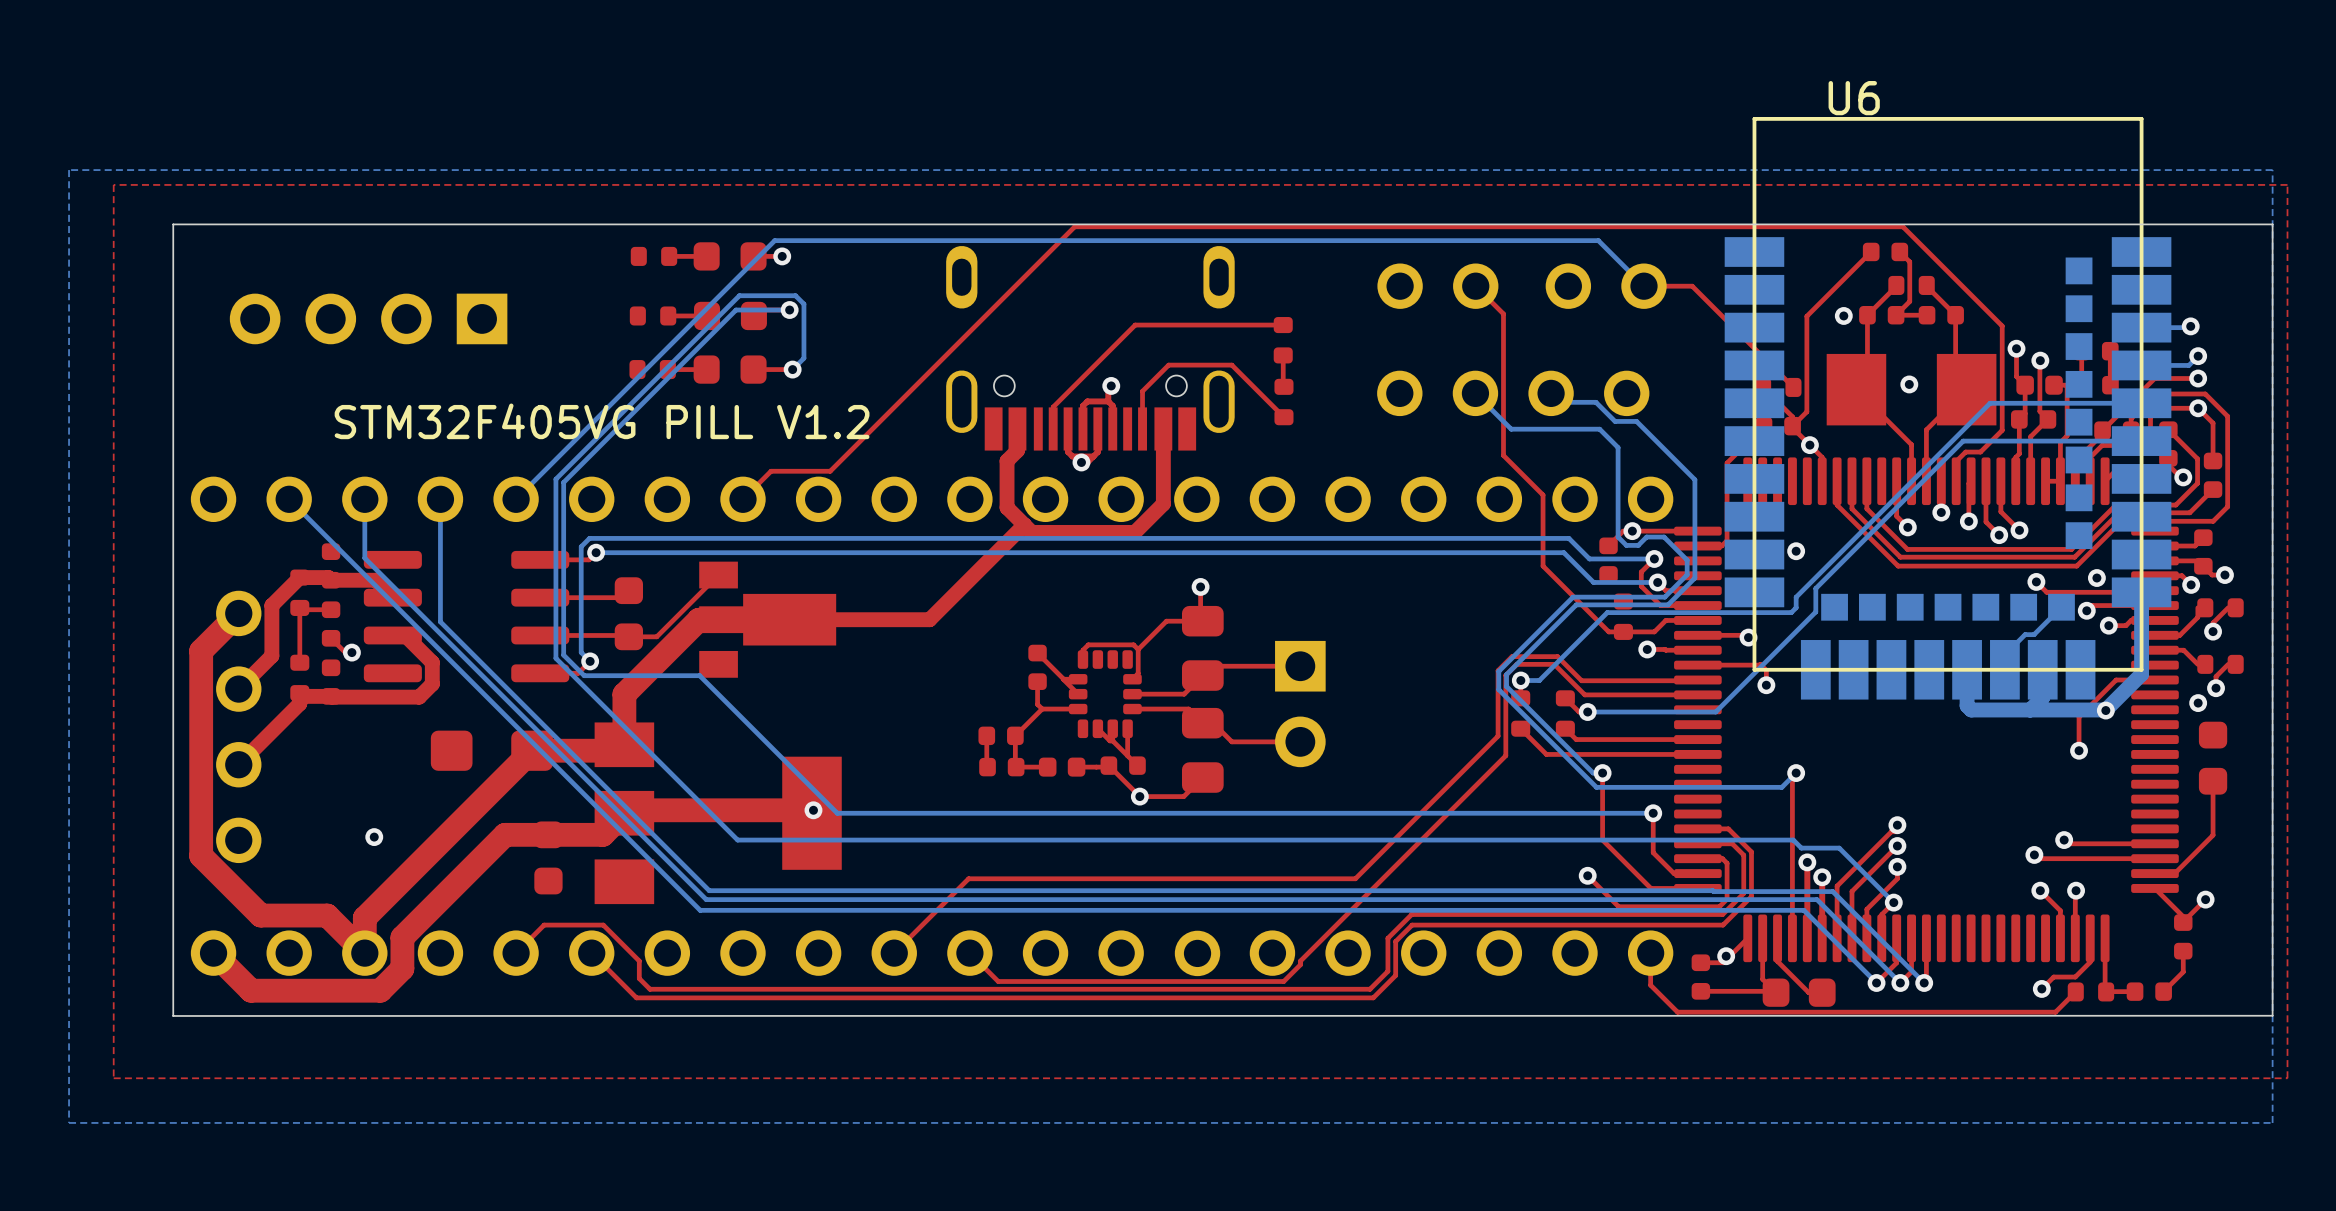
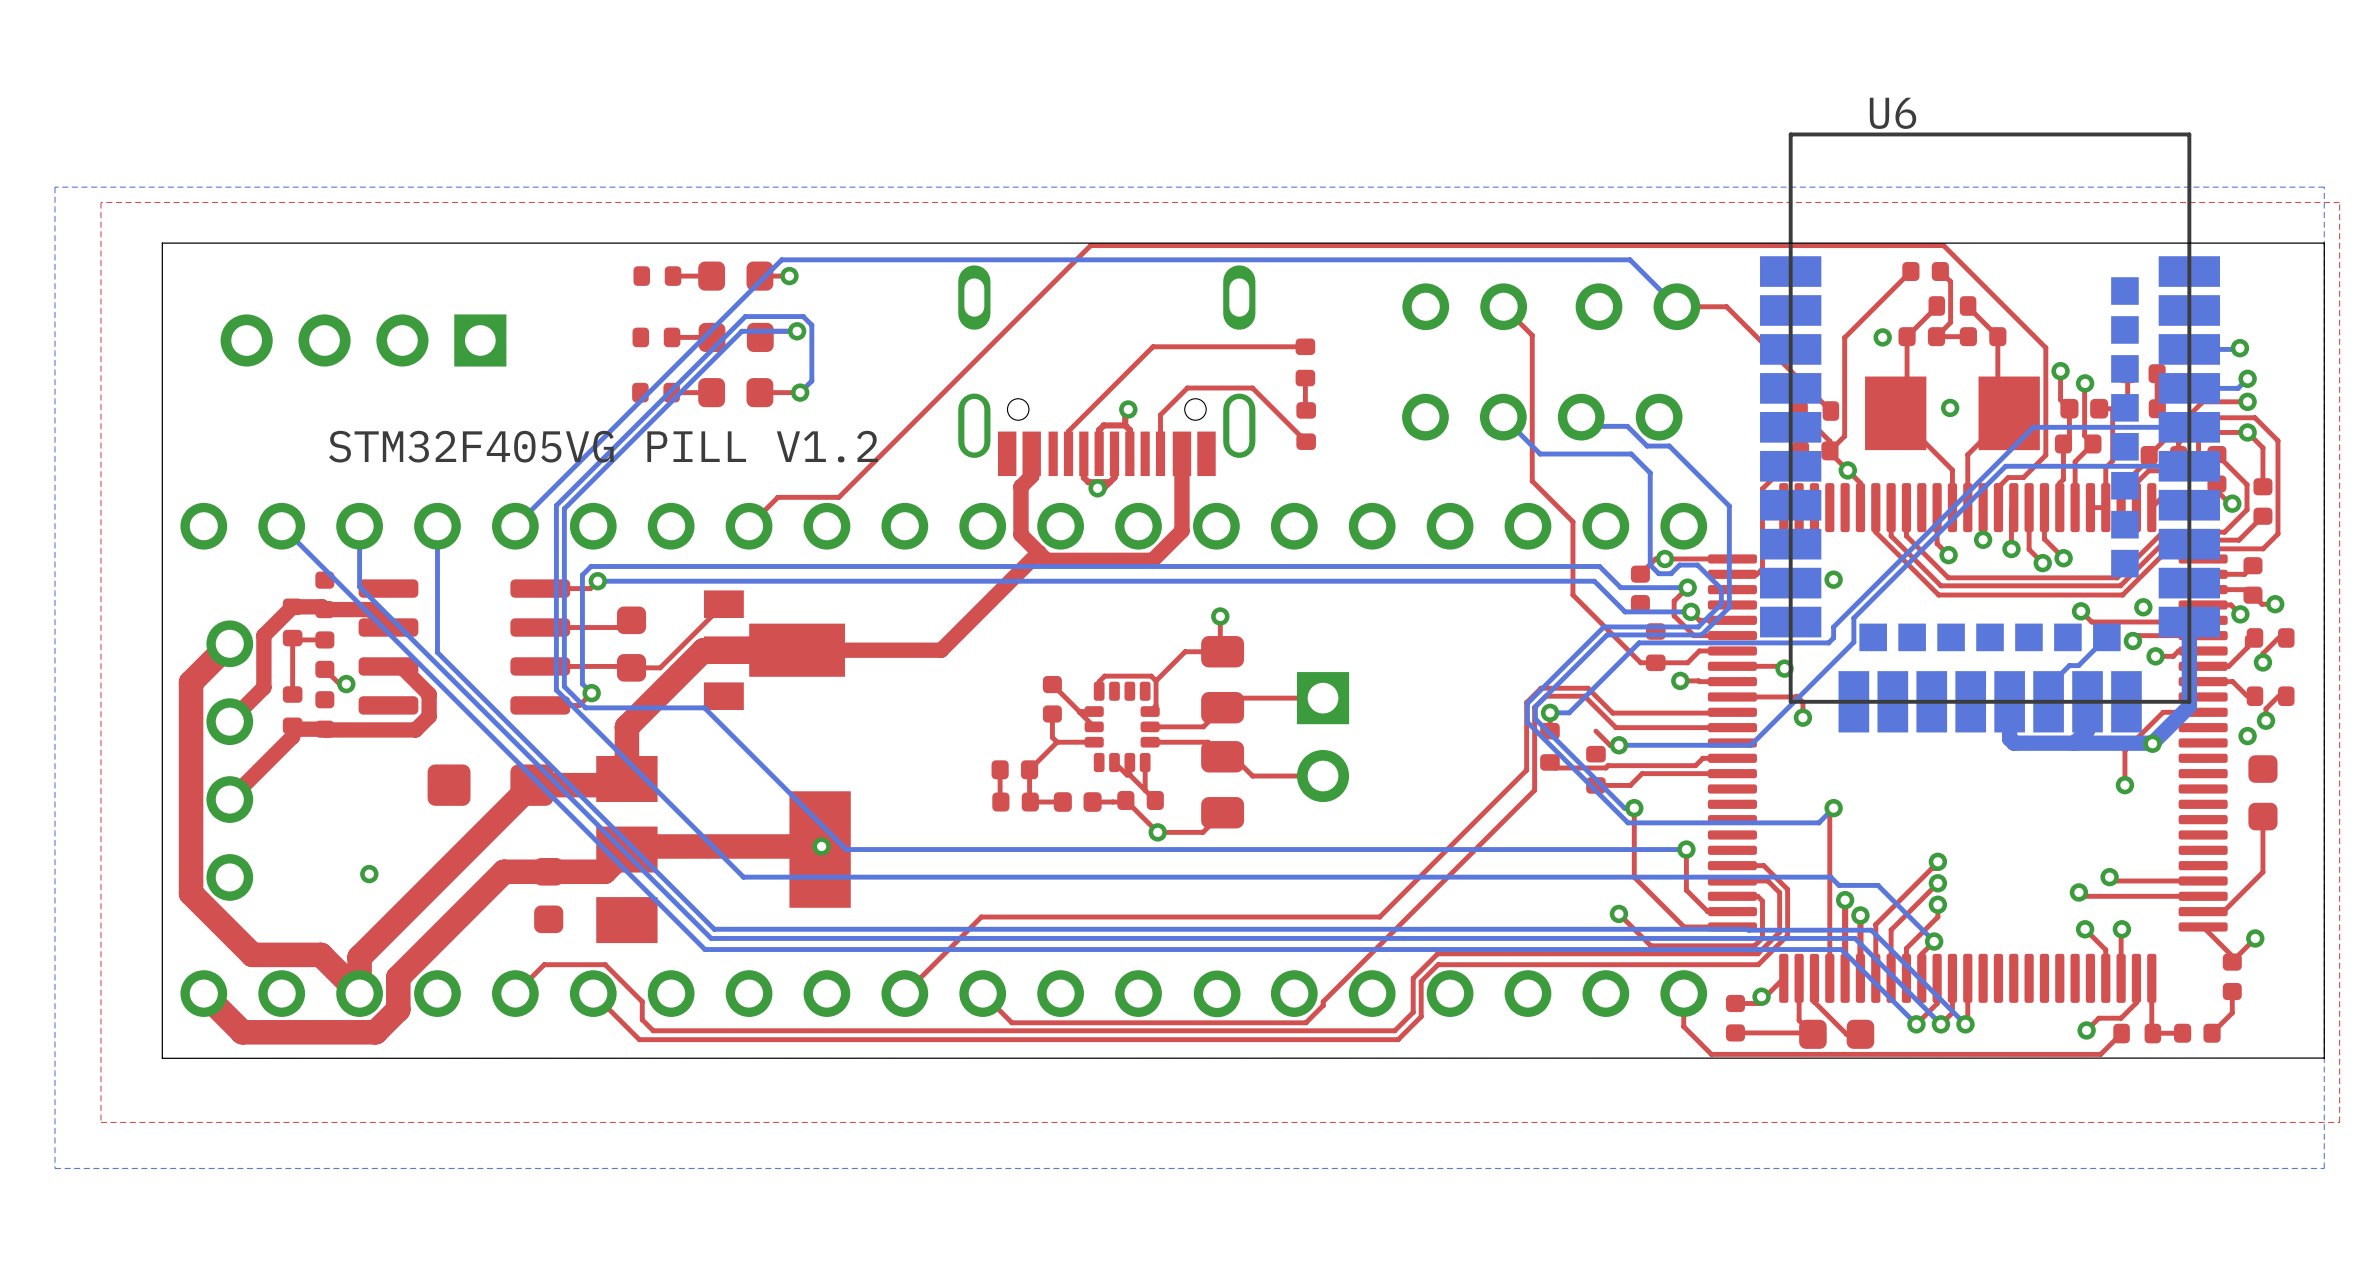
part position: (1565, 713) -> (1595, 769)
top track: (1565, 728) (1576, 739) (1610, 739) -> (1595, 785) (1630, 785) (1642, 773)
top track: (1526, 734) (1546, 754) (1697, 754) -> (1555, 767) (1695, 765) (1702, 758) (1732, 758)

